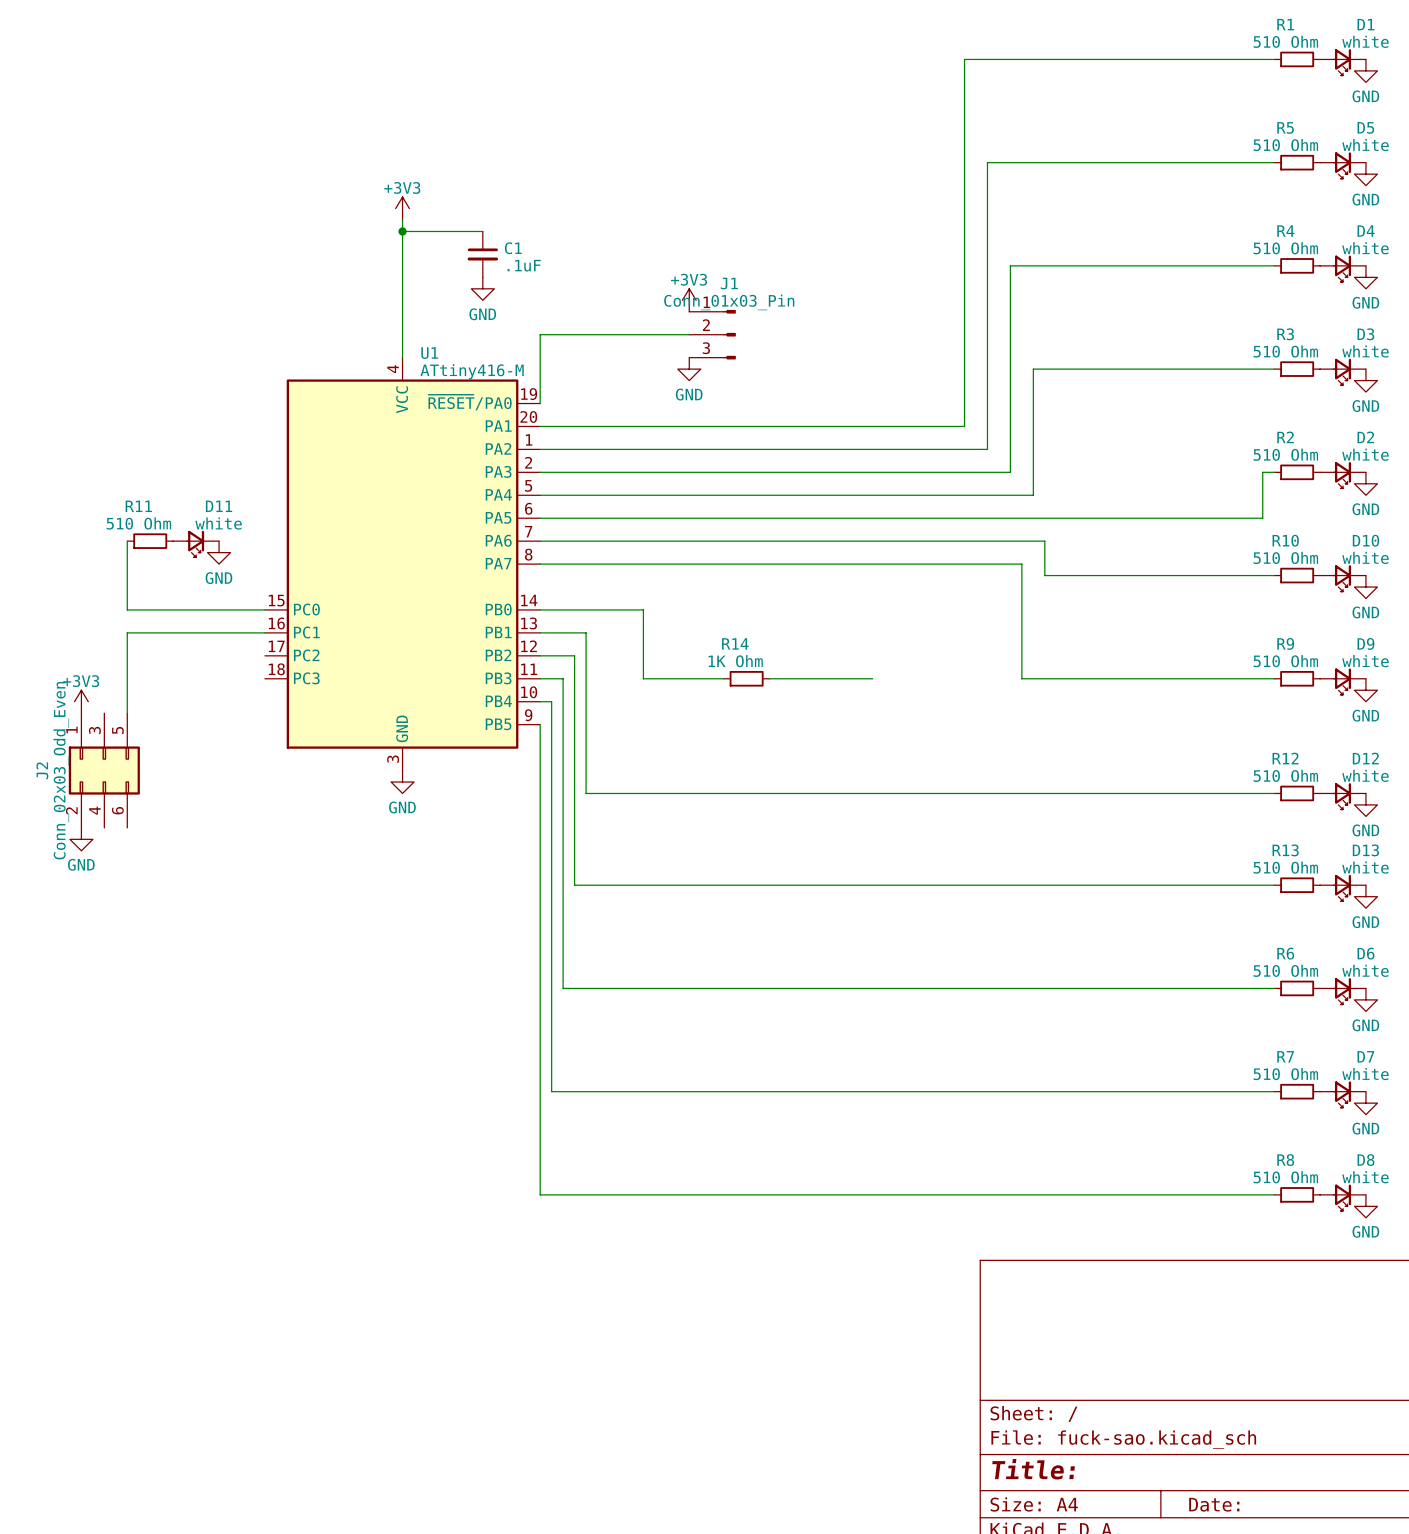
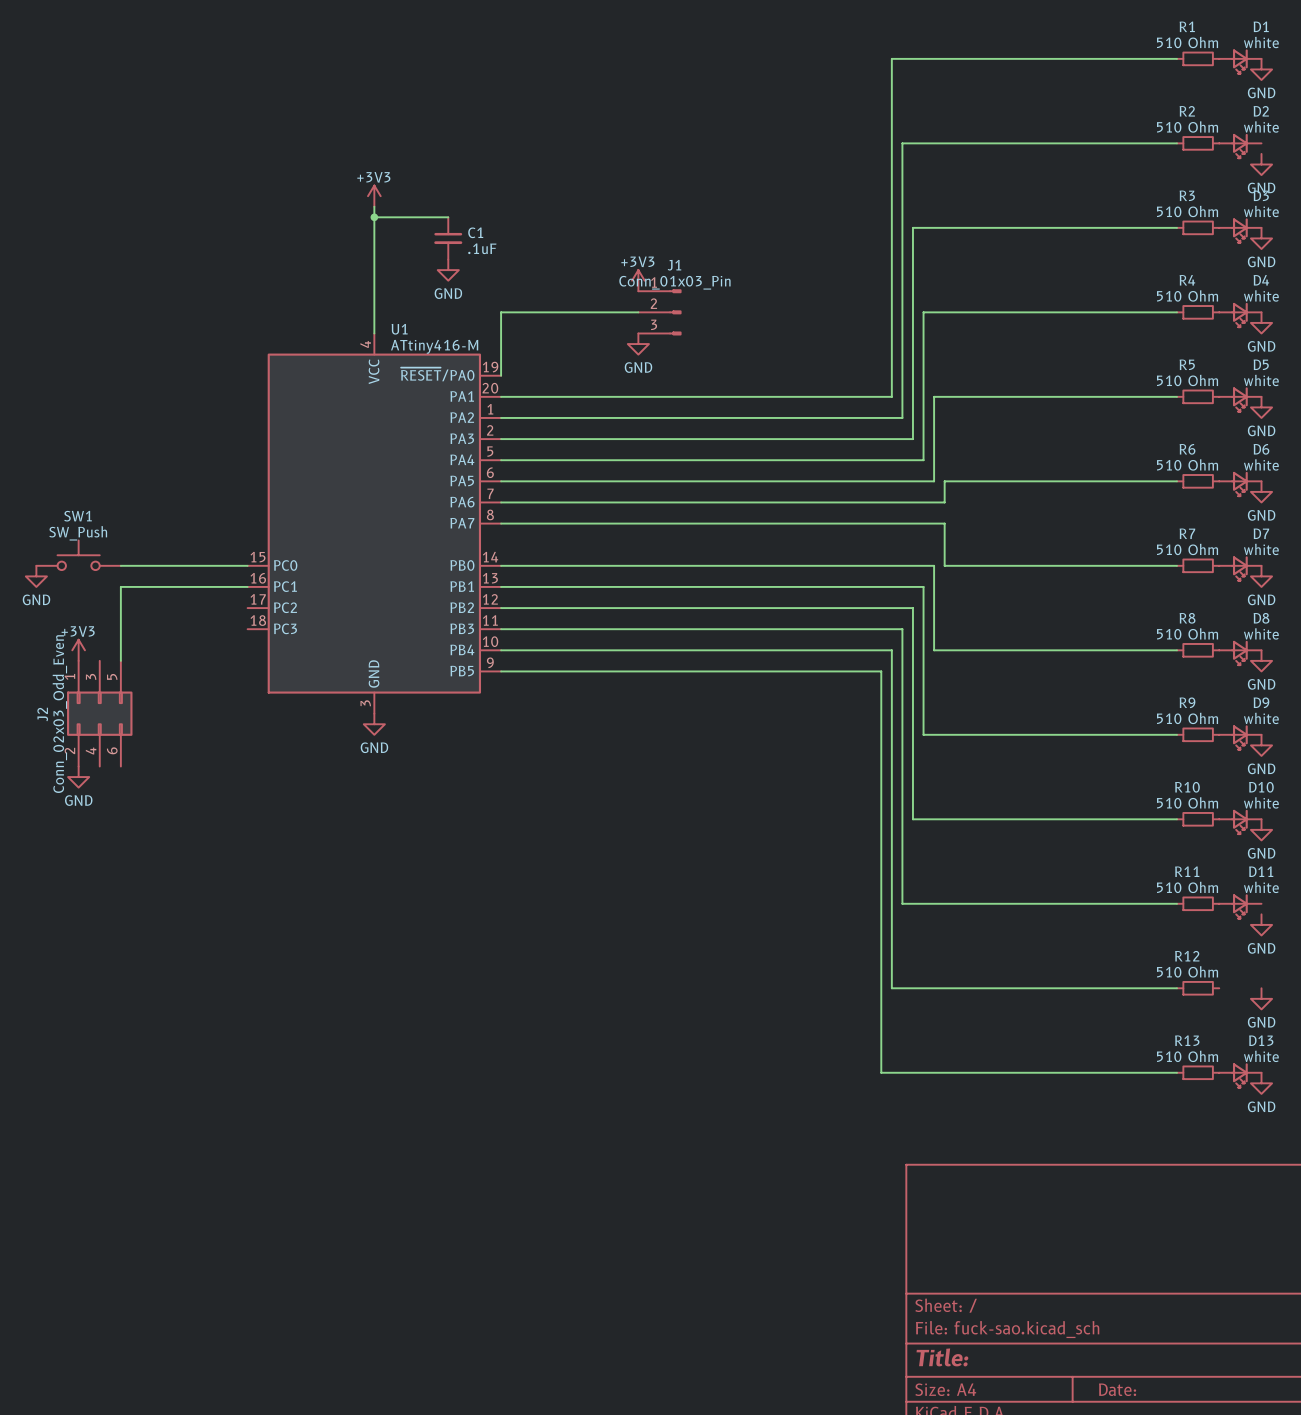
wire: none -> (1177, 143) (902, 143) (902, 417)
wire: (1274, 162) (987, 162) (987, 242) -> (1177, 227) (912, 227)
R5 position: (1297, 162) -> (1198, 396)
D5 position: (1343, 165) -> (1240, 399)
wire: (1274, 265) (1010, 265) (1010, 426) -> (1177, 396) (934, 396)
R4 position: (1297, 265) -> (1198, 312)
D4 position: (1343, 268) -> (1240, 315)
power symbol position: GND (1365, 277) -> GND (1261, 238)
power symbol: none -> GND (1261, 322)
wire: (1274, 369) (1033, 369) (1033, 495) (998, 495) -> (1177, 312) (923, 312) (923, 460)
R3 position: (1297, 369) -> (1198, 227)
D3 position: (1343, 371) -> (1240, 230)
power symbol: GND (1365, 380) -> none
power symbol: none -> GND (1261, 407)
wire: (976, 449) (987, 449) -> (912, 439) (912, 417)
wire: (987, 472) (1010, 472) -> (934, 481) (934, 439)
wire: (1274, 472) (1262, 472) (1262, 518) -> (1177, 481) (1166, 481)
R2 position: (1297, 472) -> (1198, 143)
D2 position: (1343, 475) -> (1240, 146)
power symbol: GND (1365, 483) -> none
wire: (1010, 518) (1021, 518) -> (944, 502) (944, 481)
power symbol: none -> GND (1261, 491)
wire: (127, 541) (127, 609) -> none
R11 position: (150, 541) -> (1198, 903)
wire: (1021, 541) (1044, 541) (1044, 575) (1274, 575) -> none
D11 position: (196, 544) -> (1240, 906)
power symbol position: GND (219, 552) -> GND (36, 576)
R10: 510 Ohm (1297, 575) -> none
D10: white (1343, 578) -> none
power symbol: GND (1365, 587) -> none
SW1: none -> SW_Push (78, 555)
wire: (643, 609) (643, 678) -> (522, 629) (596, 629)
wire: none -> (596, 565) (934, 565) (934, 650) (1177, 650)
wire: (1021, 609) (1021, 678) (1274, 678) -> (944, 565) (1177, 565)
power symbol: none -> GND (1261, 576)
wire: (586, 632) (586, 793) (998, 793) -> (543, 586) (923, 586) (923, 734)
wire: (574, 655) (574, 885) (987, 885) -> (532, 608) (912, 608) (912, 819)
wire: (563, 678) (563, 988) (1274, 988) -> none
wire: none -> (670, 629) (712, 629)
R14: 1K Ohm (746, 678) -> none
wire: none -> (807, 629) (902, 629) (902, 903) (1177, 903)
R9: 510 Ohm (1297, 678) -> none
D9: white (1343, 681) -> none
power symbol position: GND (1365, 690) -> GND (1261, 660)
wire: (551, 701) (551, 1091) (1274, 1091) -> (511, 650) (891, 650) (891, 988) (1177, 988)
wire: (540, 724) (540, 1194) (1274, 1194) -> (501, 671) (881, 671) (881, 1072) (1177, 1072)
R12 name: R12 (1285, 758) -> R9 (1187, 702)
D12 name: D12 (1365, 758) -> D9 (1261, 702)
R13 name: R13 (1285, 850) -> R10 (1187, 787)
D13 name: D13 (1365, 850) -> D10 (1261, 787)
R6 position: (1297, 988) -> (1198, 481)
D6 position: (1343, 991) -> (1240, 483)
R12: none -> 510 Ohm (1198, 988)
R7 position: (1297, 1091) -> (1198, 565)
D7 position: (1343, 1094) -> (1240, 568)
power symbol position: GND (1365, 1103) -> GND (1261, 998)
R13: none -> 510 Ohm (1198, 1072)
D13: none -> white (1240, 1075)
power symbol: none -> GND (1261, 1083)
R8 position: (1297, 1194) -> (1198, 650)
D8 position: (1343, 1197) -> (1240, 652)
power symbol: GND (1365, 1206) -> none

